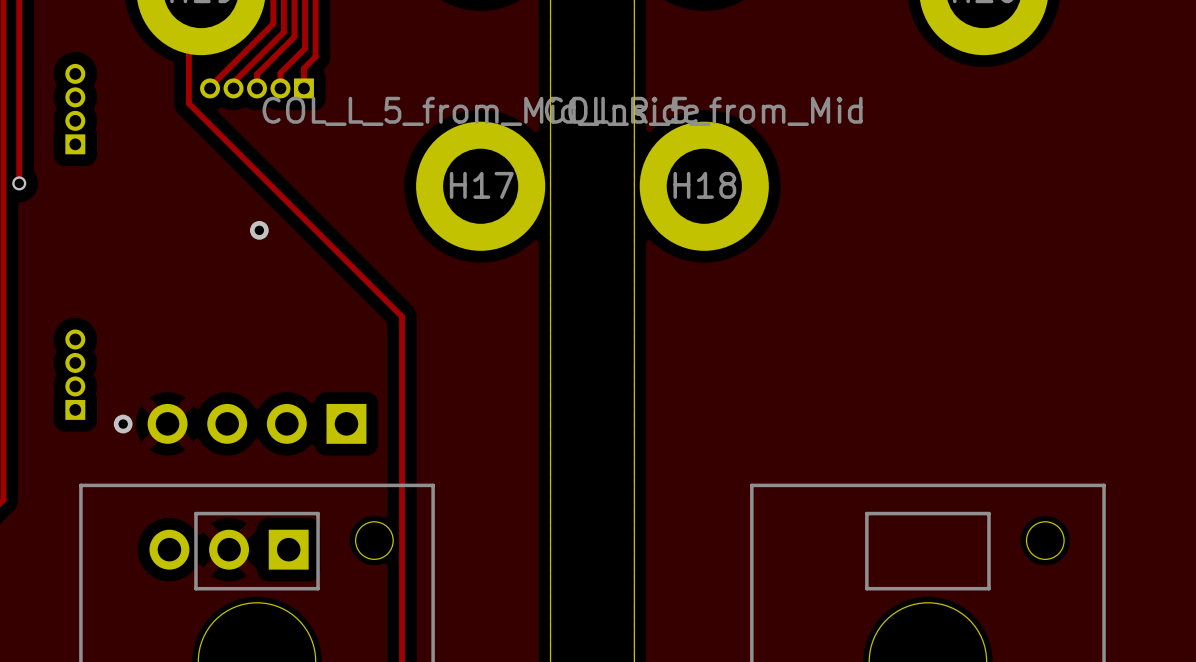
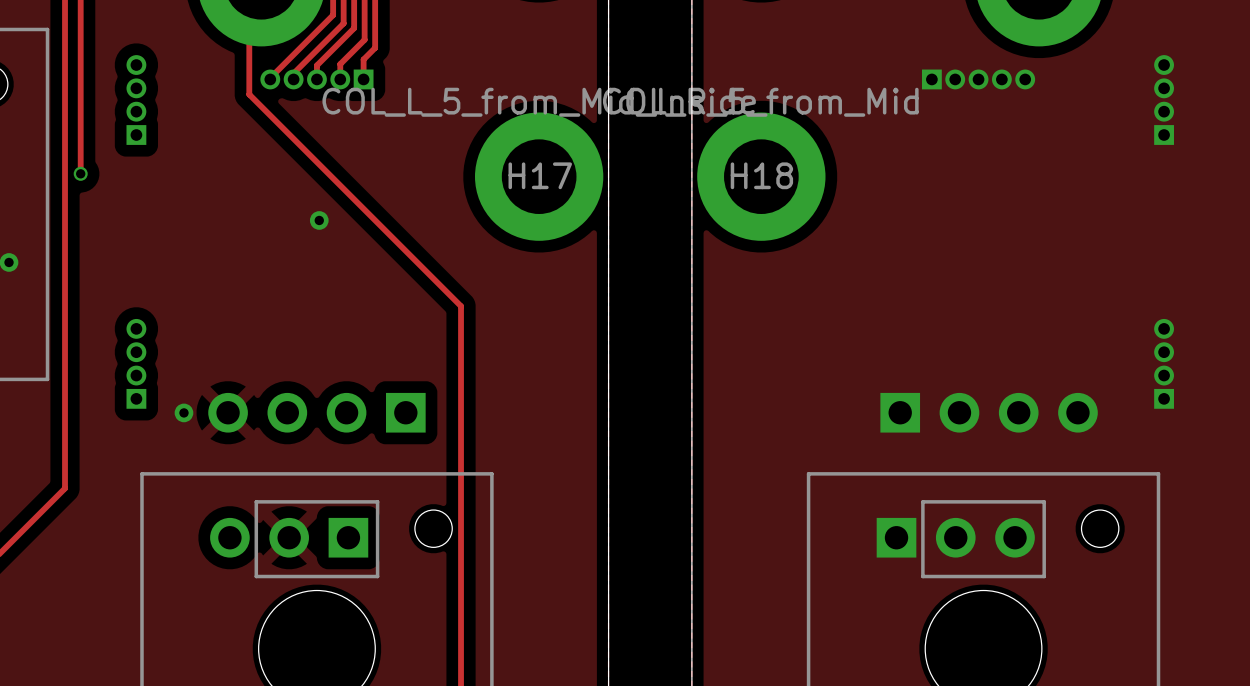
part: none -> (978, 79)
part: none -> (1164, 100)
part: none -> (1164, 363)
part: none -> (989, 412)
part: none -> (955, 537)

